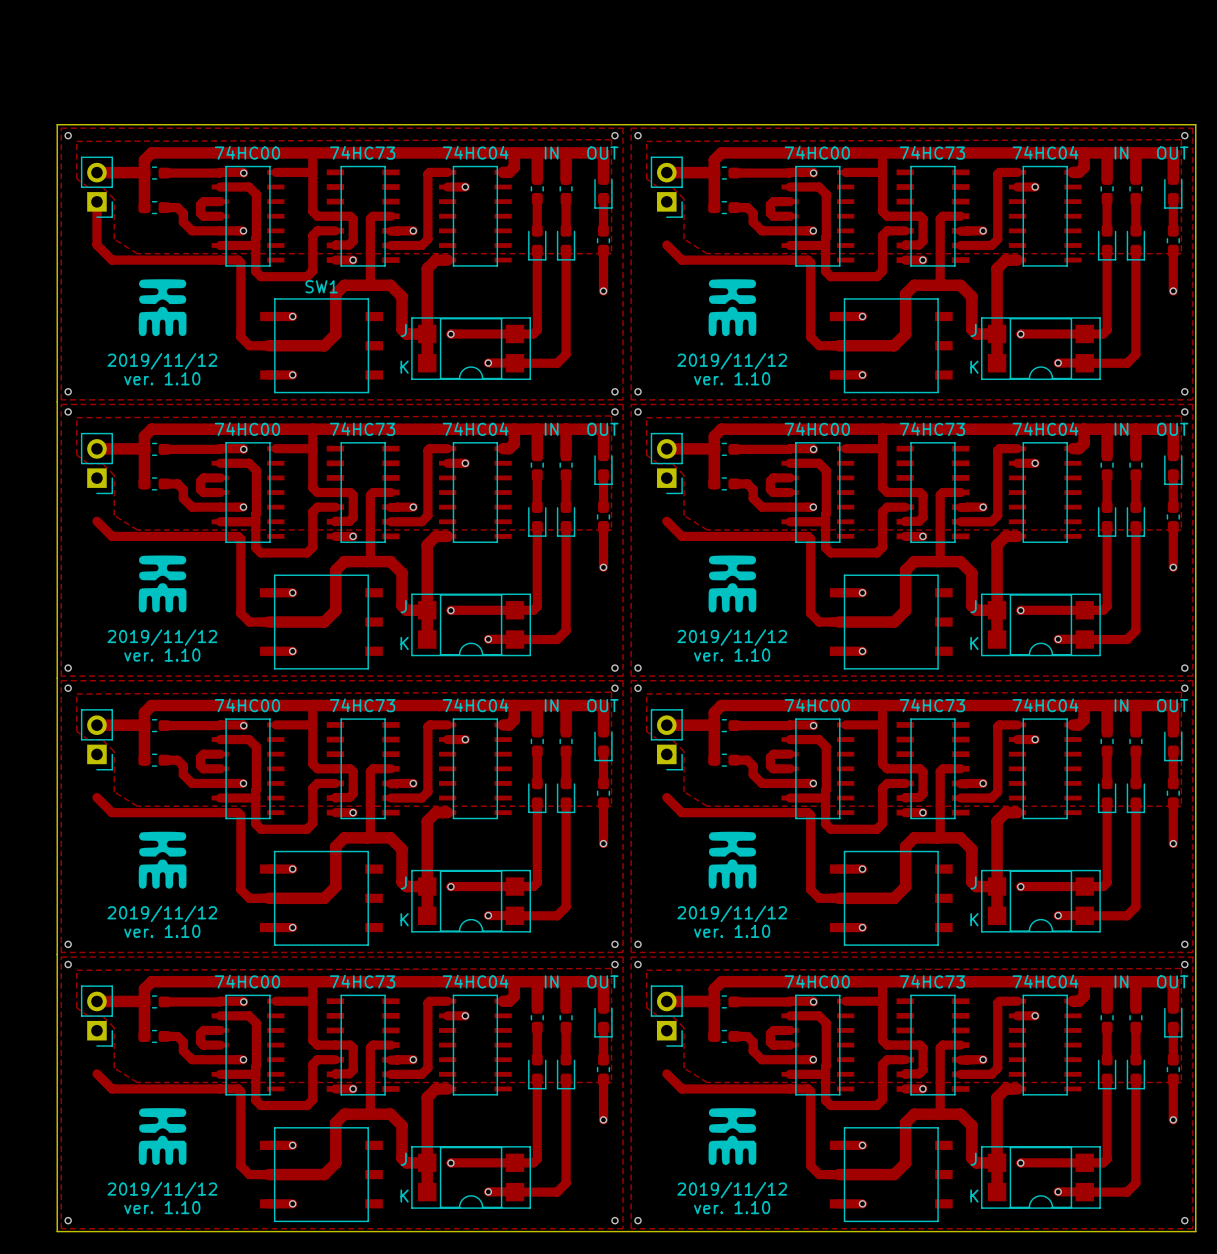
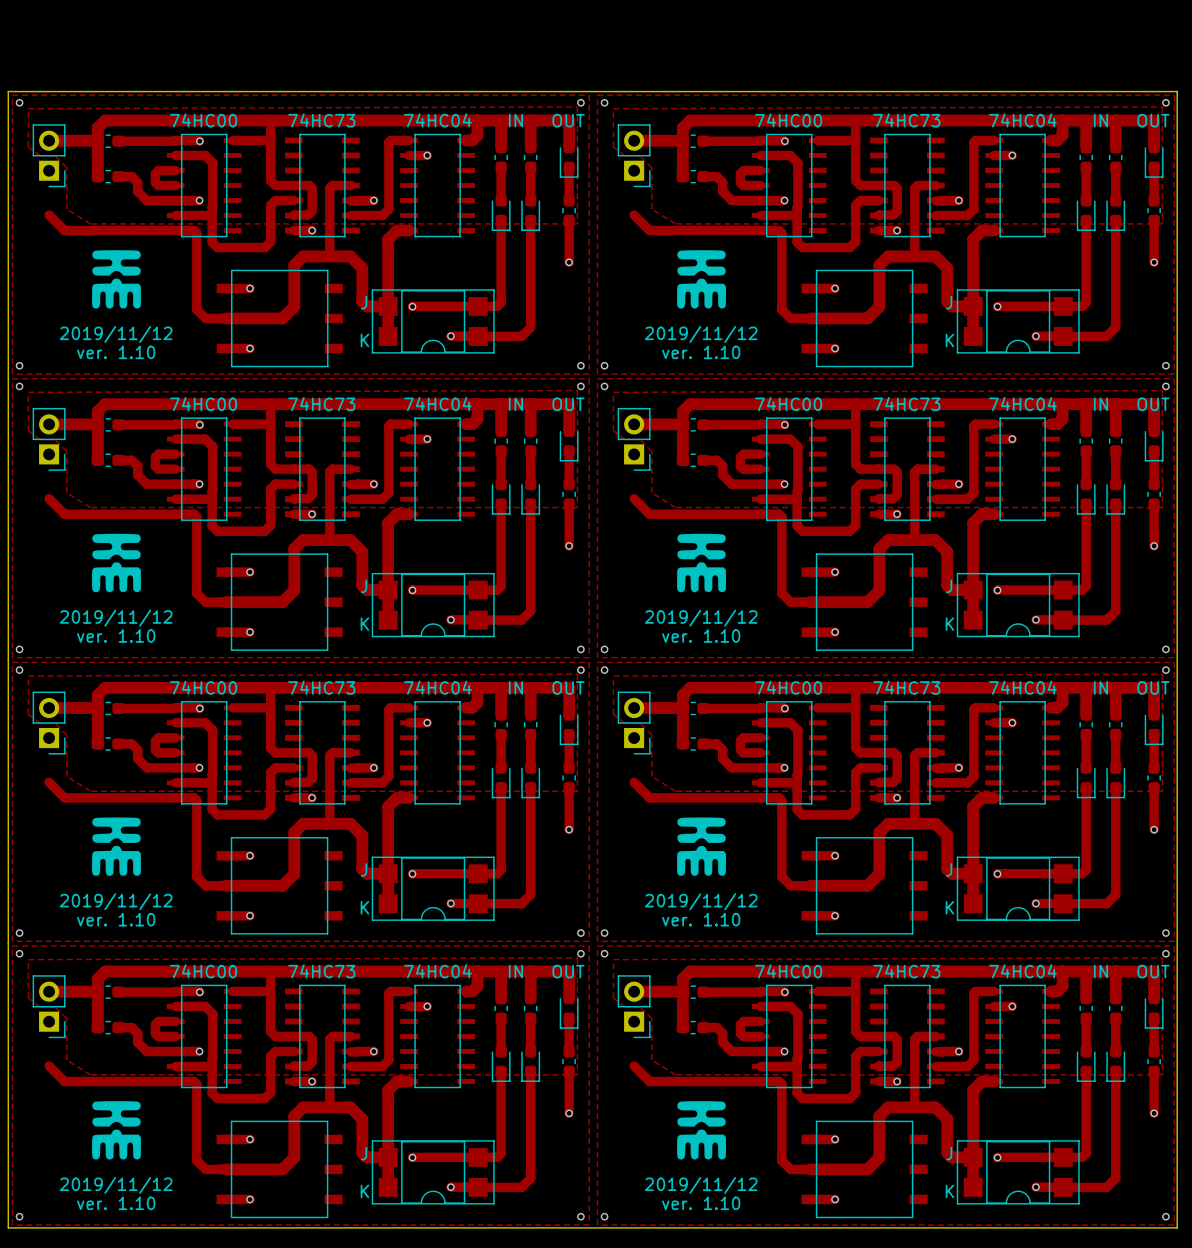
track: (96, 201) (96, 245) -> none
SW1 name: SW1 (321, 286) -> none

